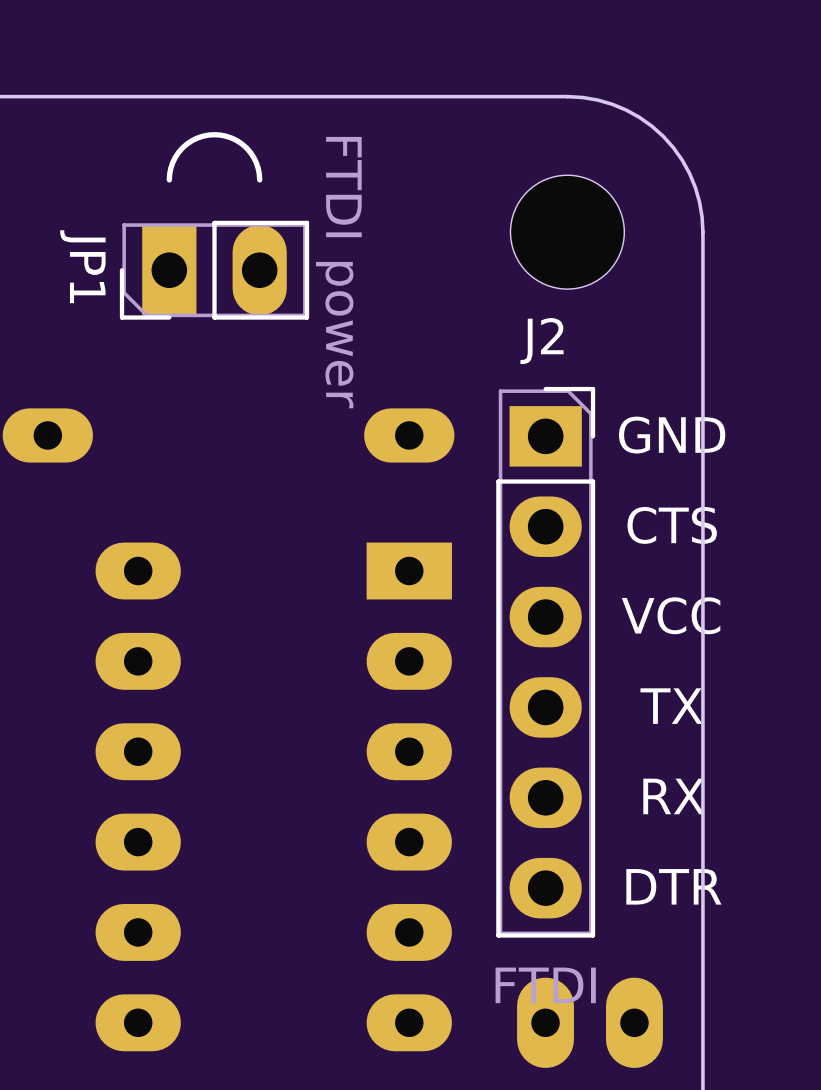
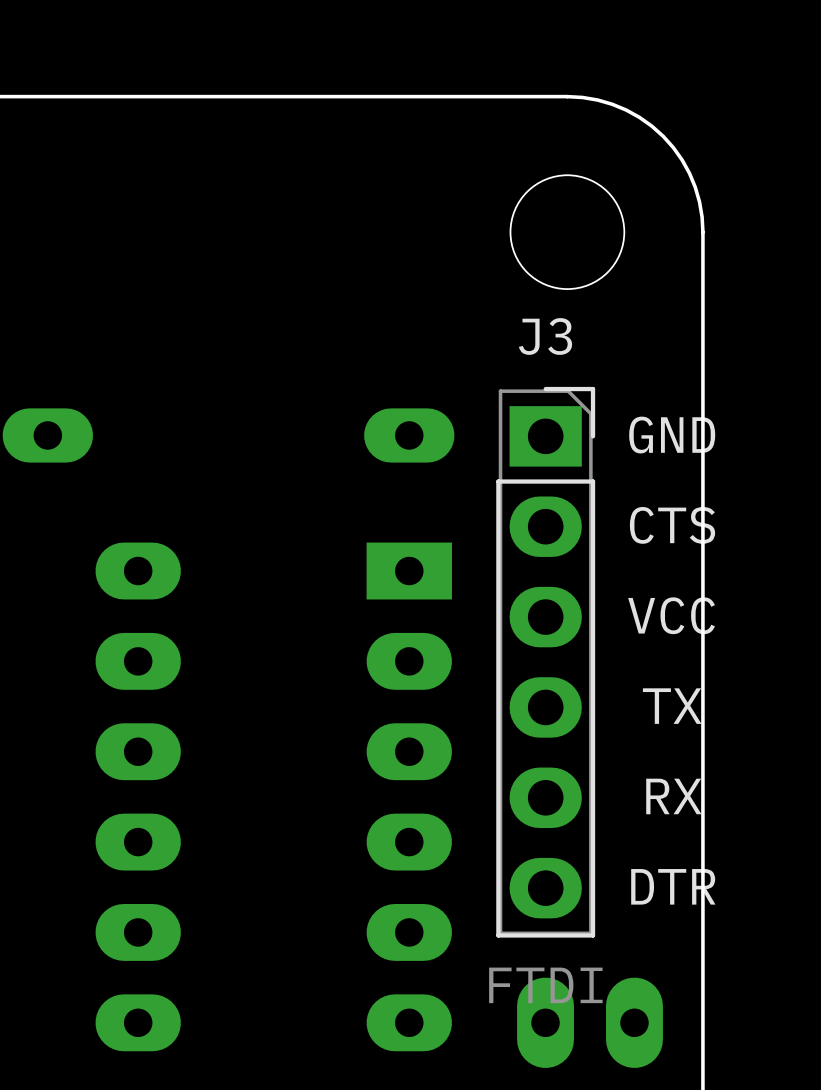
JP1: FTDI power (214, 225) -> none
J2 name: J2 (542, 341) -> J3 (545, 336)

